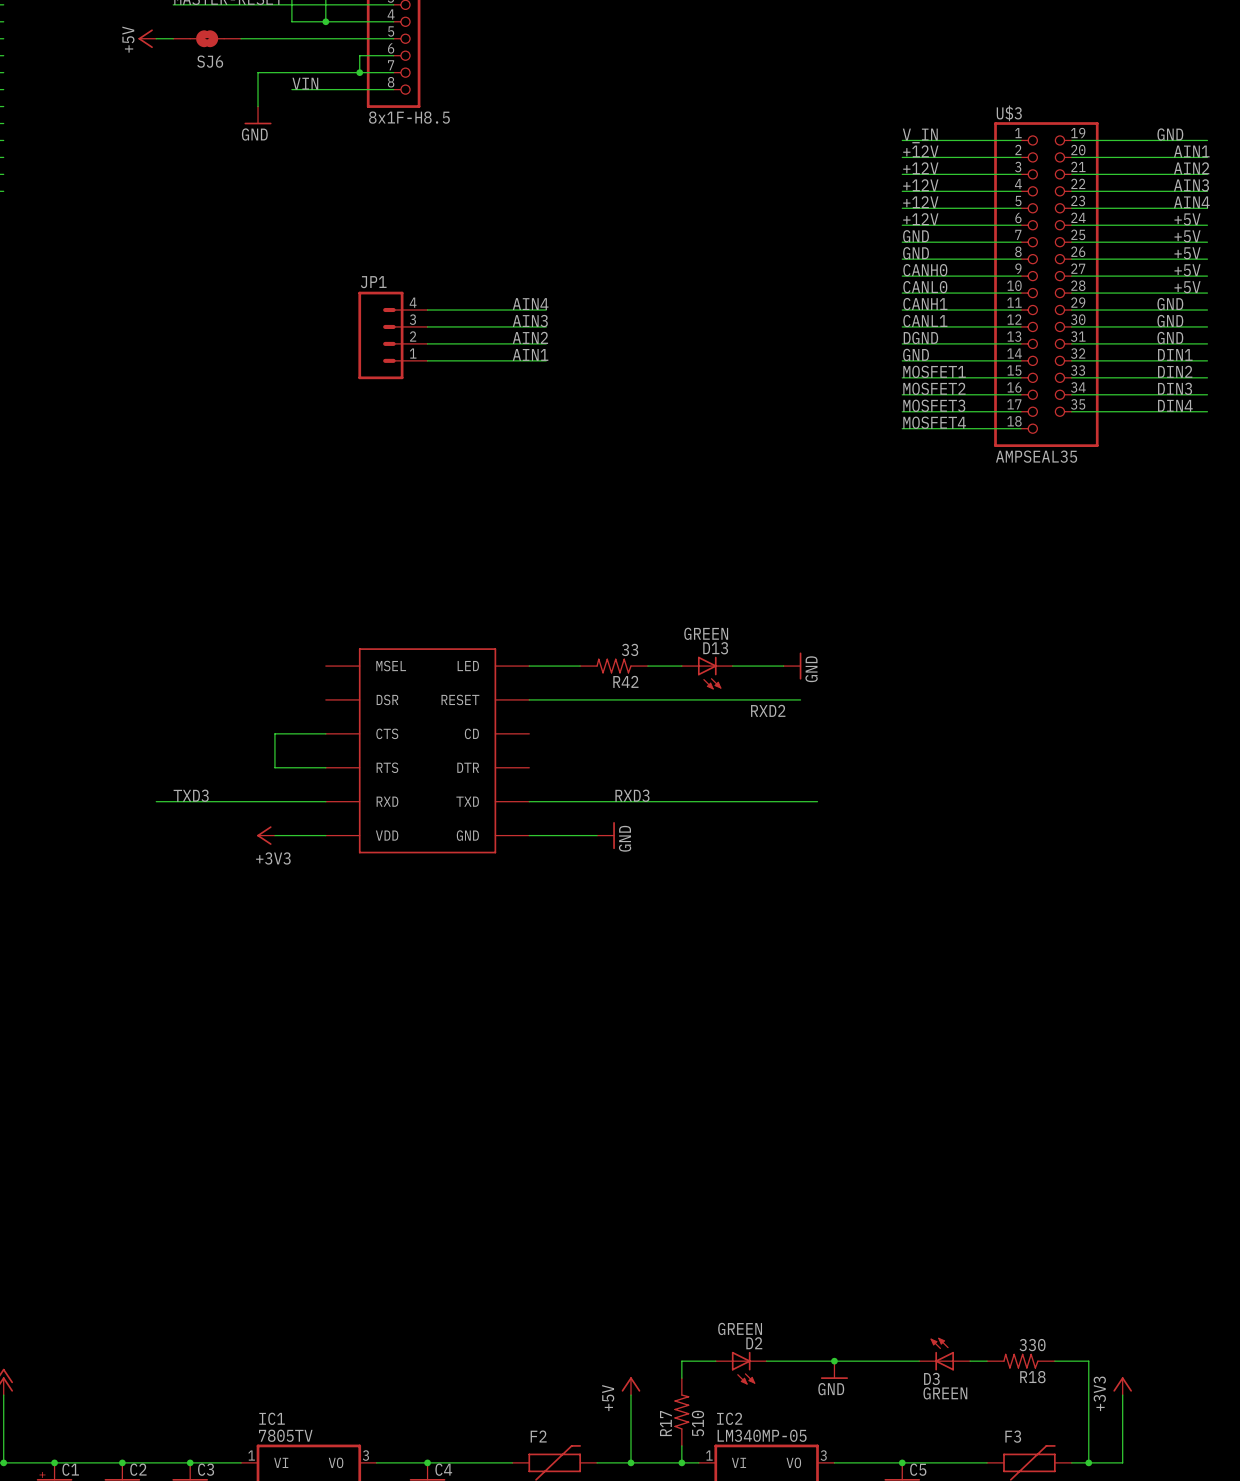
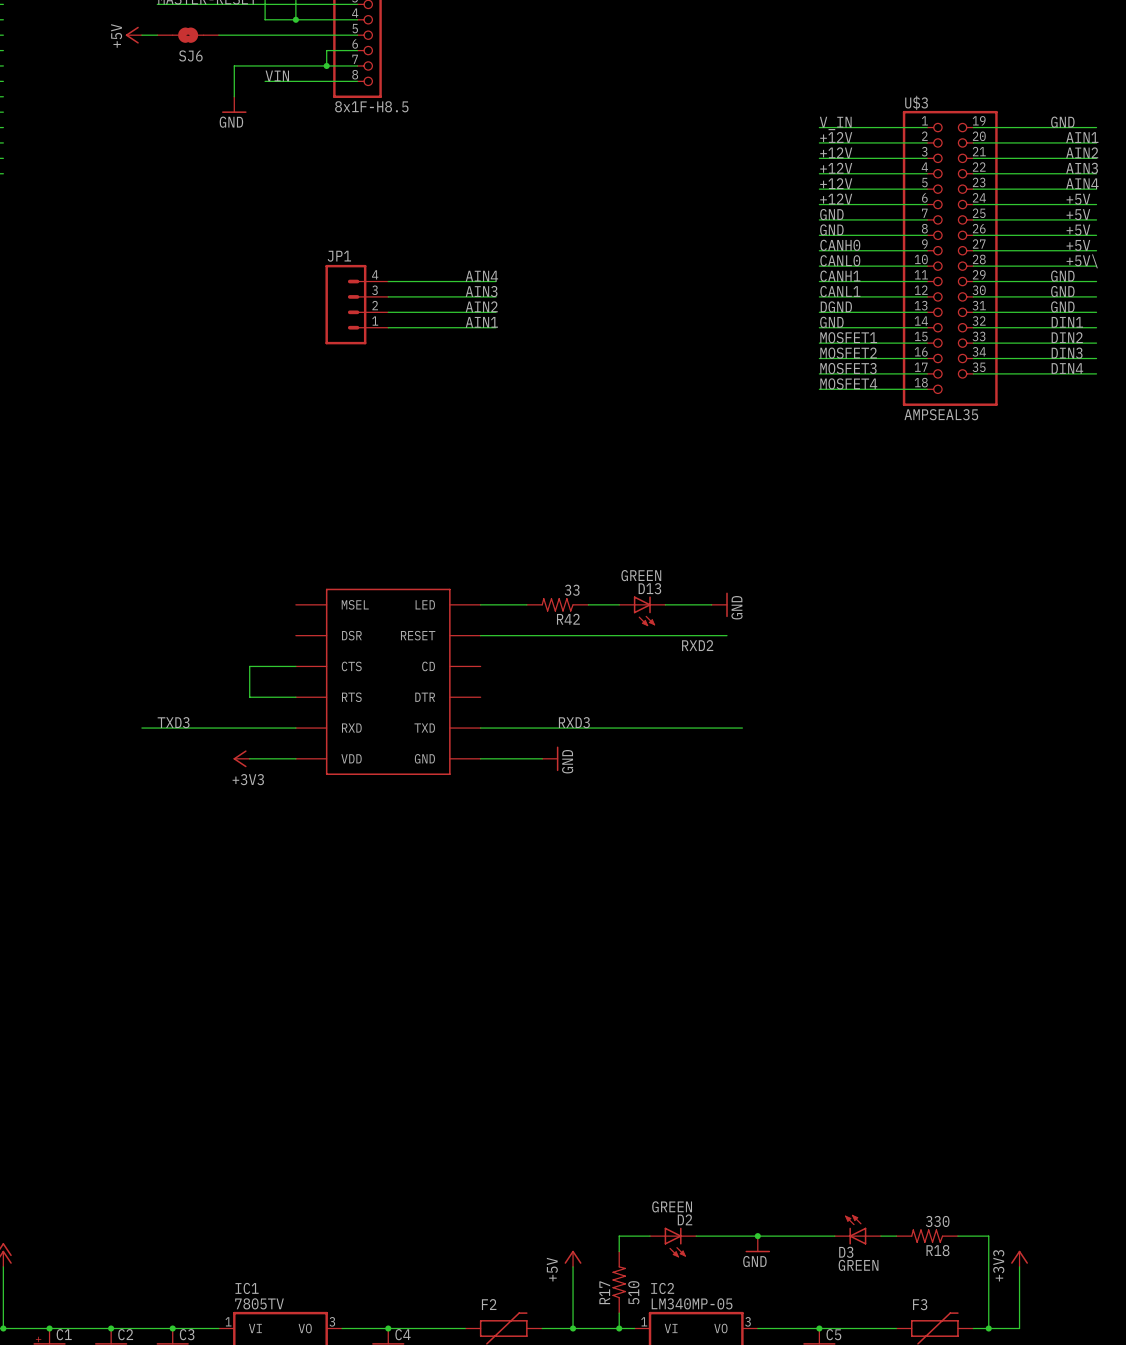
label: +5V (1187, 287) -> +5V\ (1082, 261)

